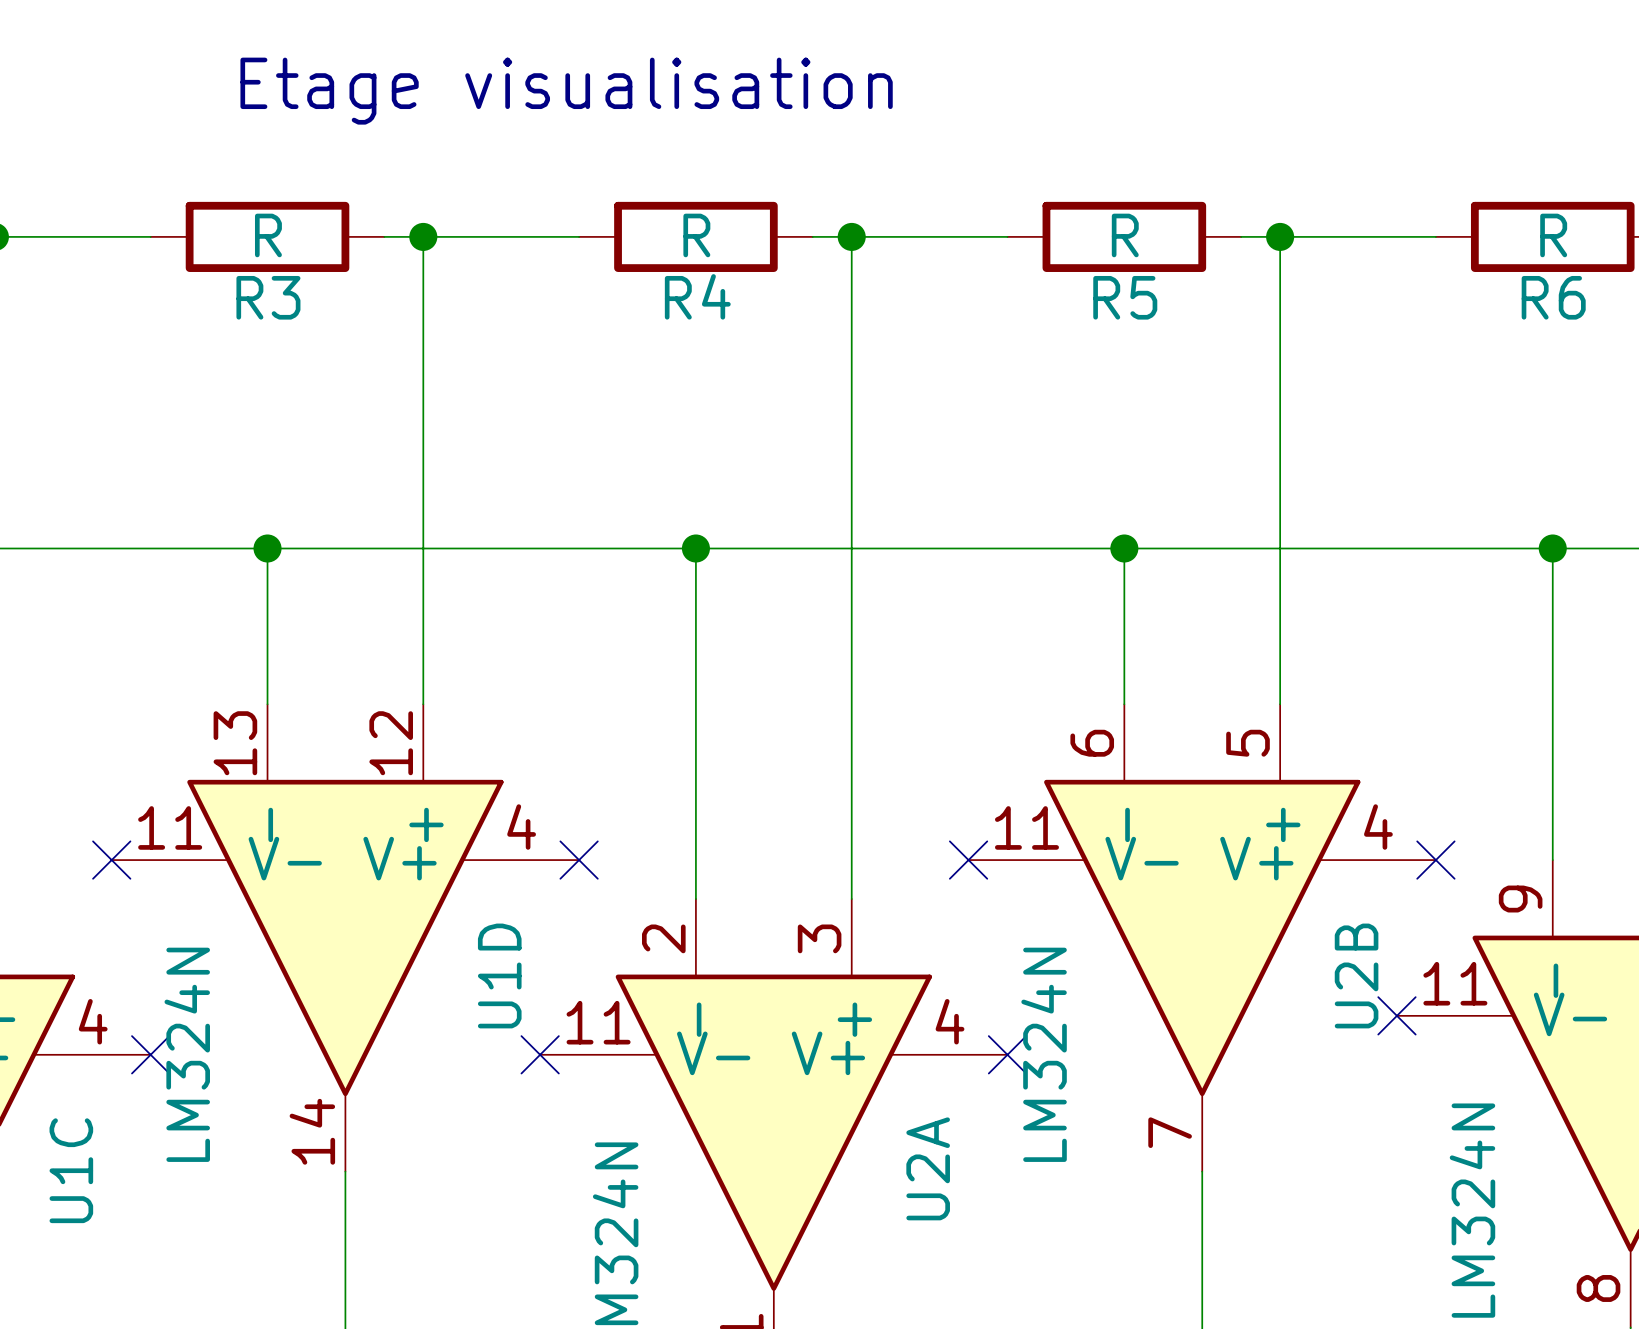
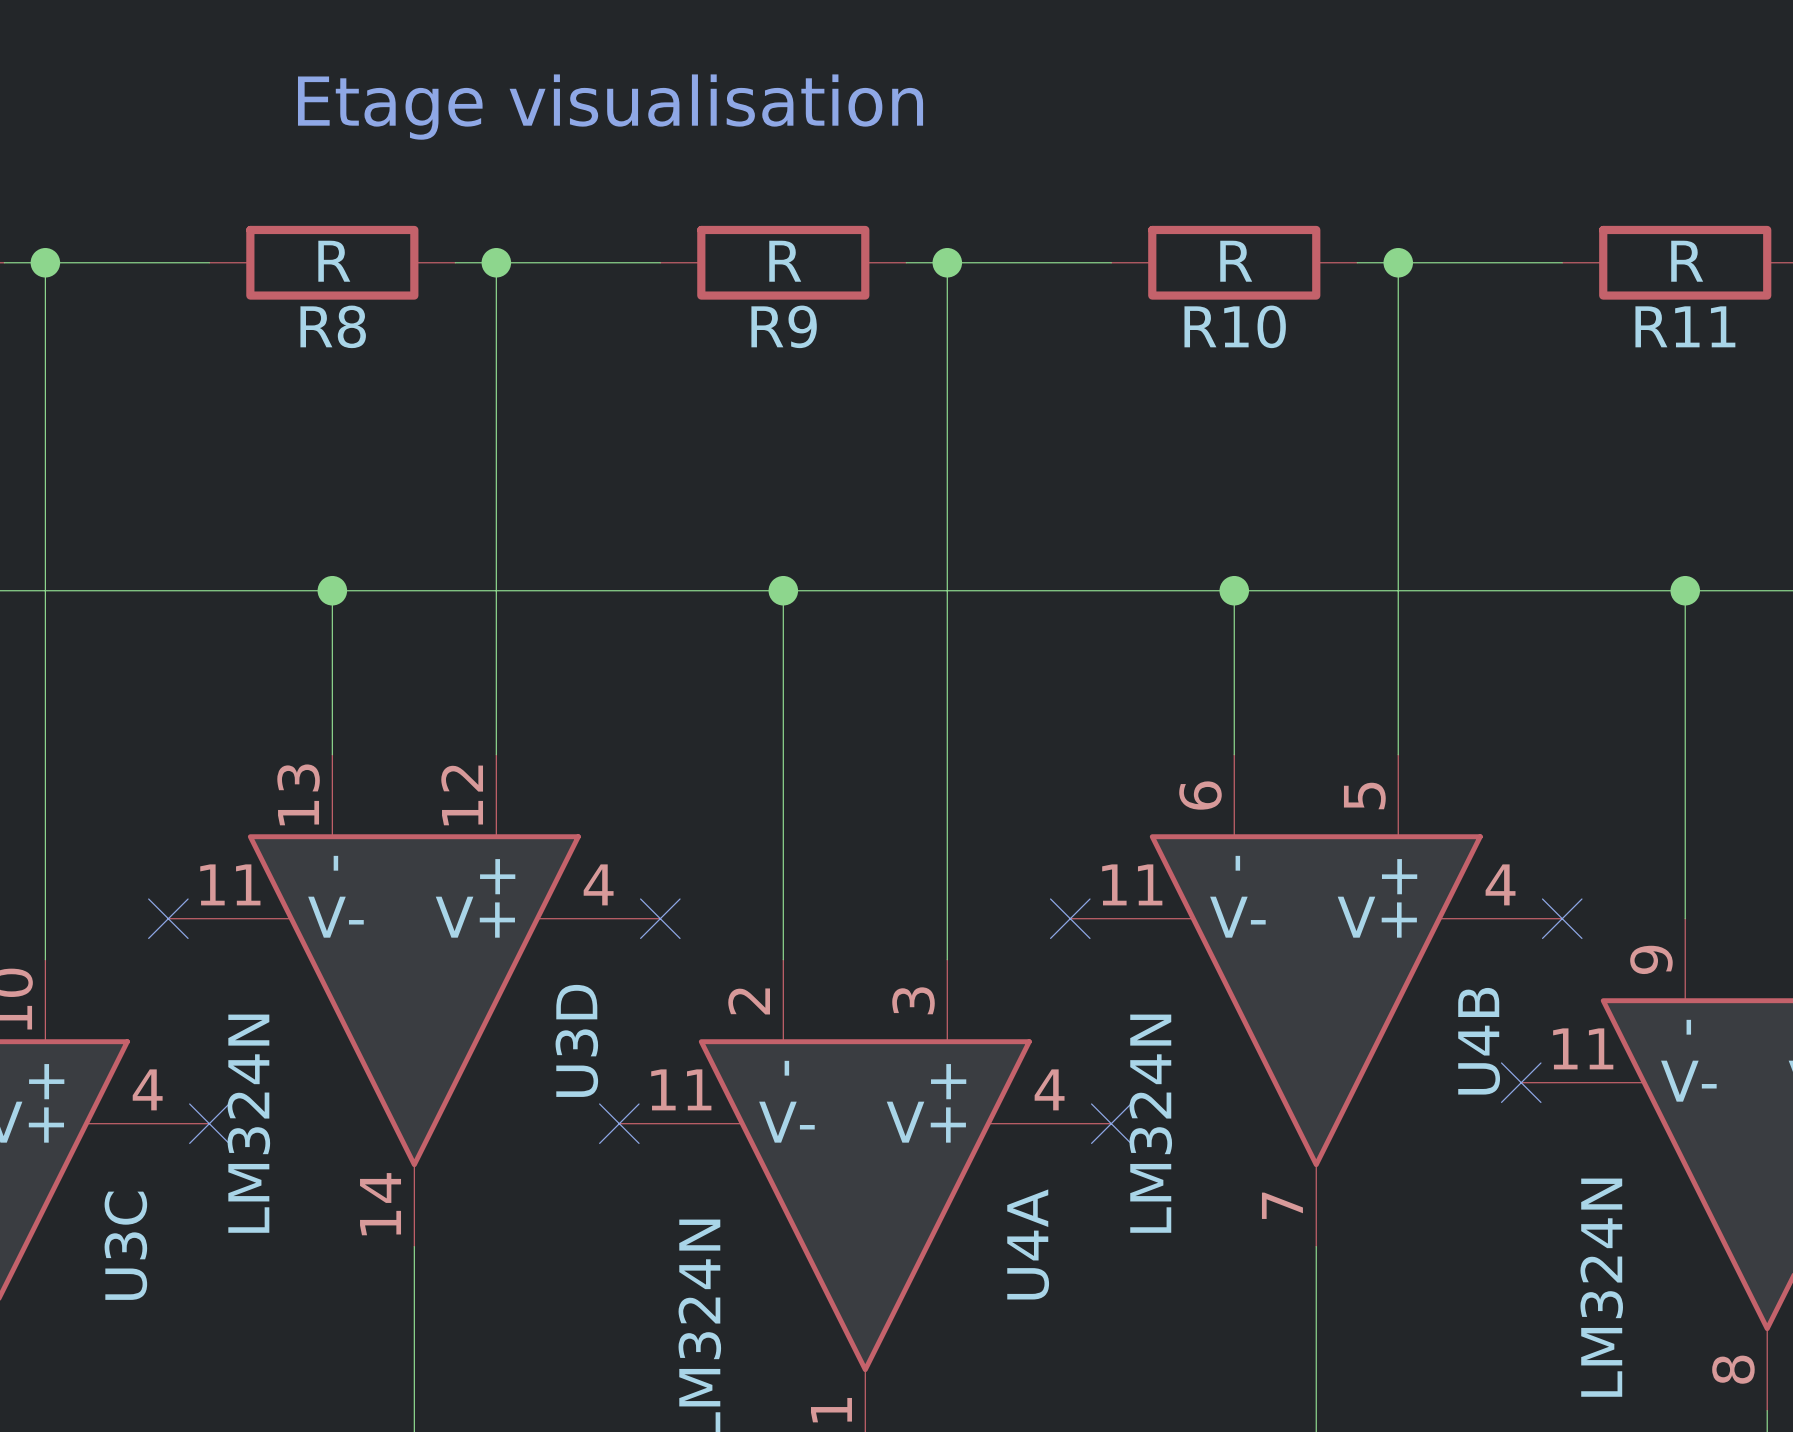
R4 name: R4 (697, 296) -> R9 (784, 326)
R3 name: R3 (268, 297) -> R8 (333, 326)
R5 name: R5 (1125, 297) -> R10 (1235, 326)
R6 name: R6 (1553, 297) -> R11 (1685, 326)
U1D name: U1D (499, 975) -> U3D (576, 1040)
U2B name: U2B (1356, 975) -> U4B (1479, 1041)
U2A name: U2A (928, 1168) -> U4A (1028, 1244)
U1C name: U1C (71, 1170) -> U3C (125, 1245)

